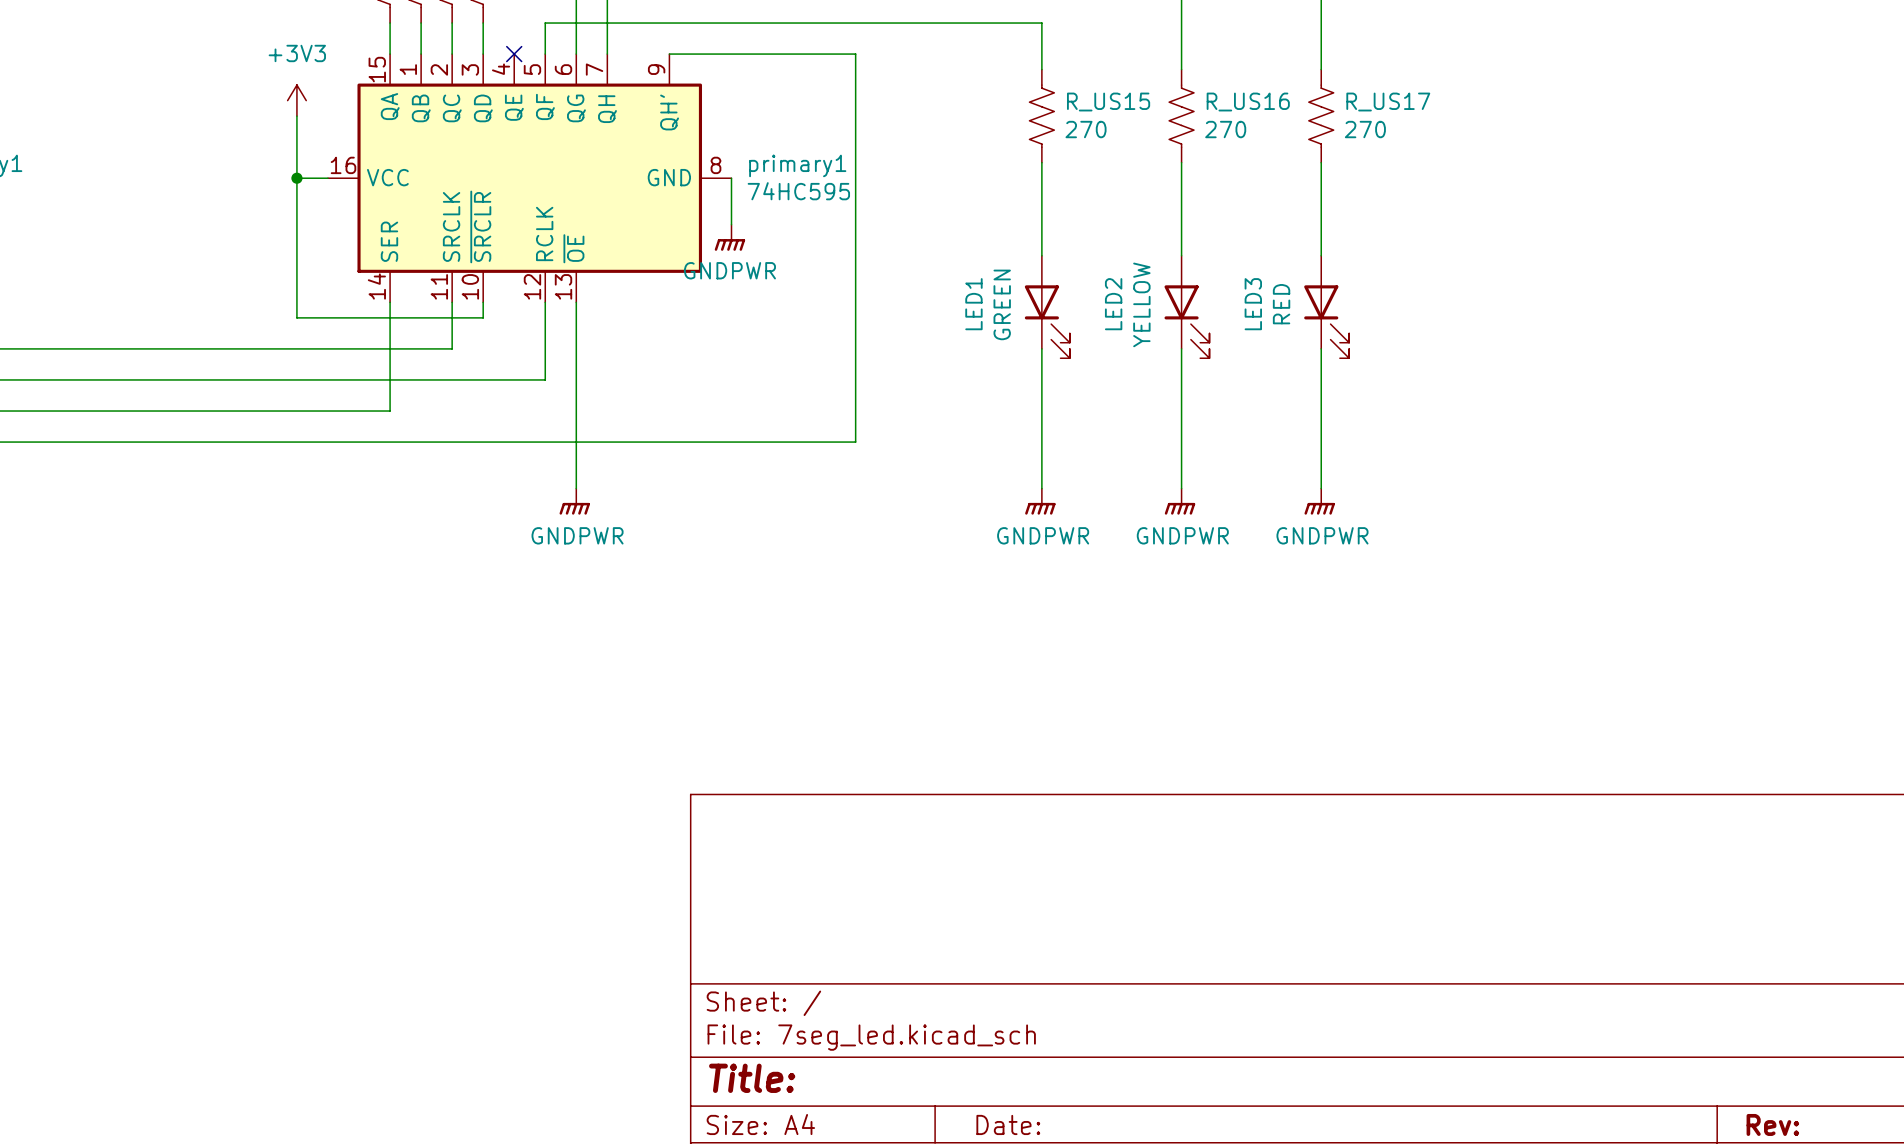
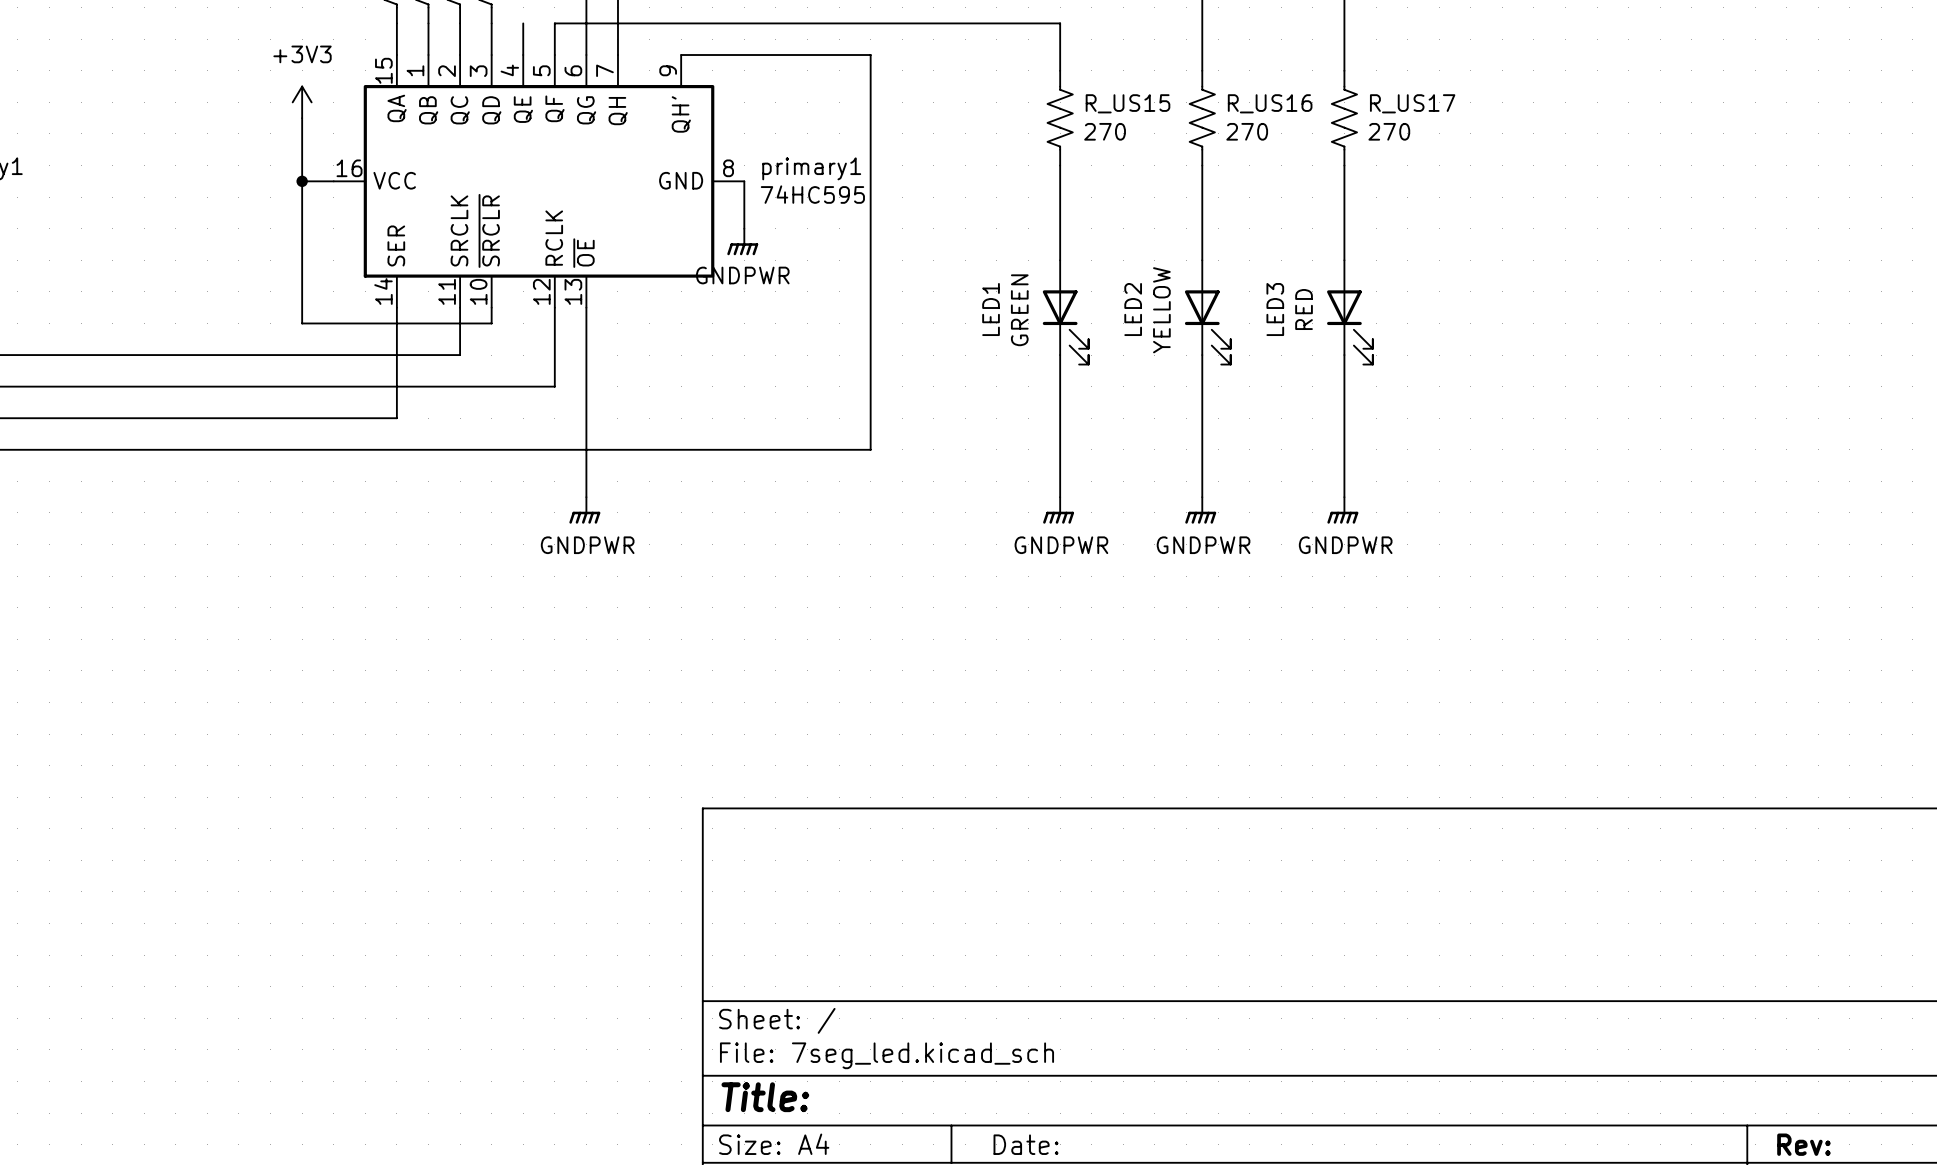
wire: none -> (523, 23) (523, 55)
no-connect mark: (514, 54) -> none

